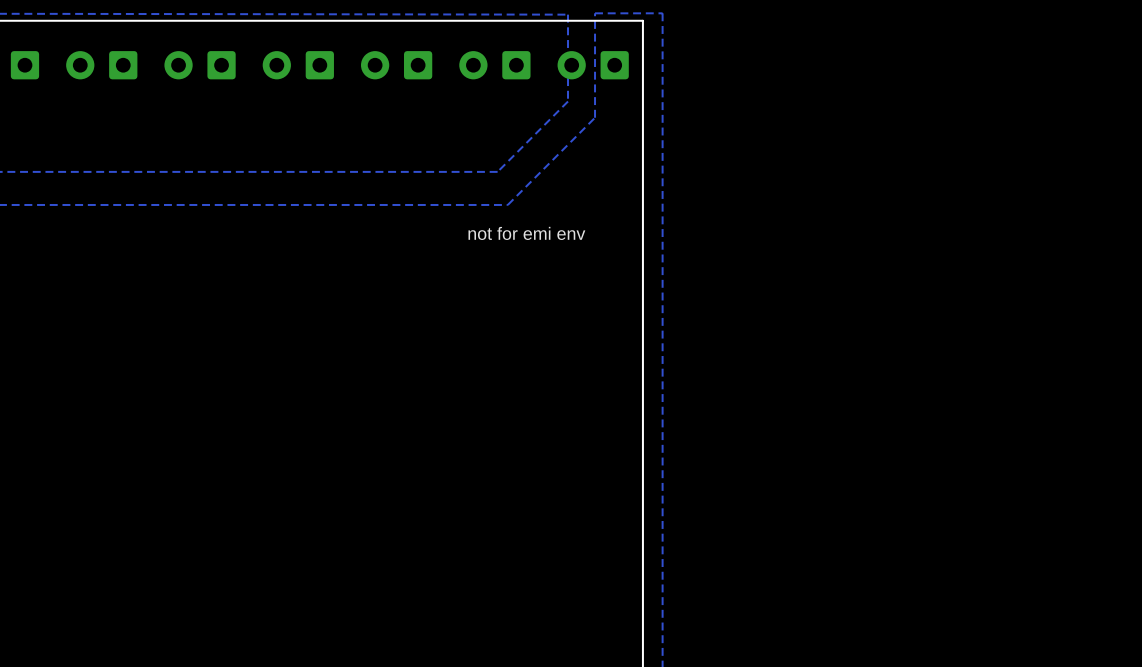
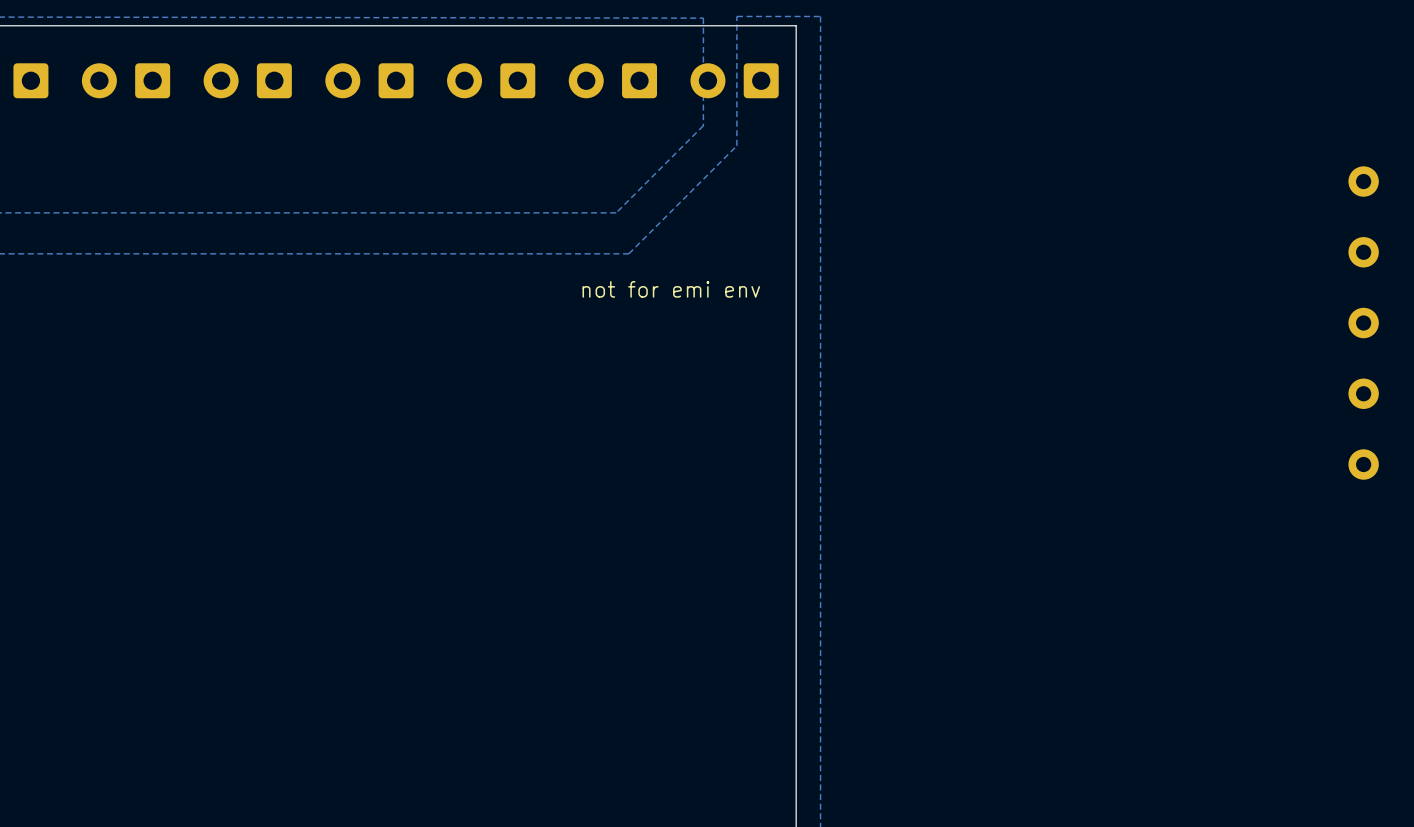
part: none -> (1363, 181)
part: none -> (1363, 252)
part: none -> (1363, 323)
part: none -> (1363, 393)
part: none -> (1363, 464)

